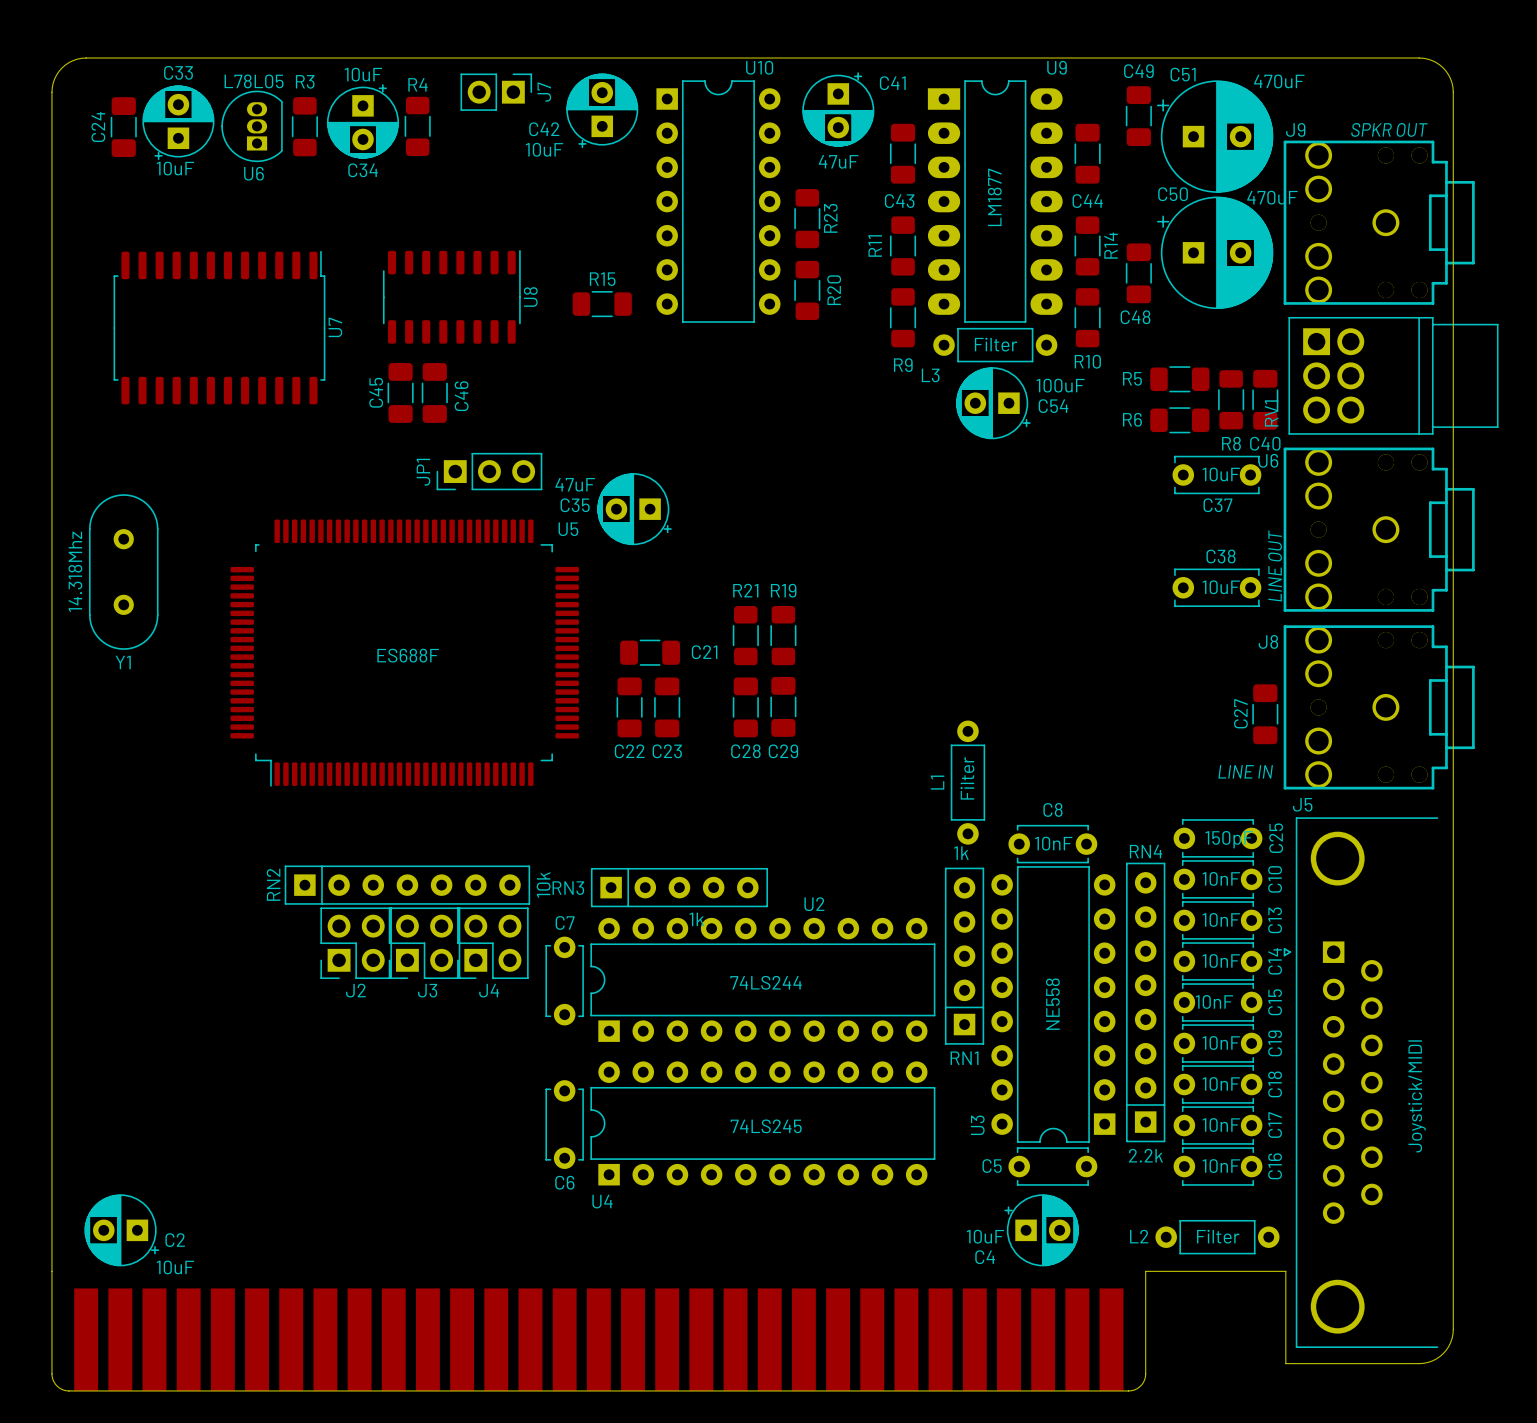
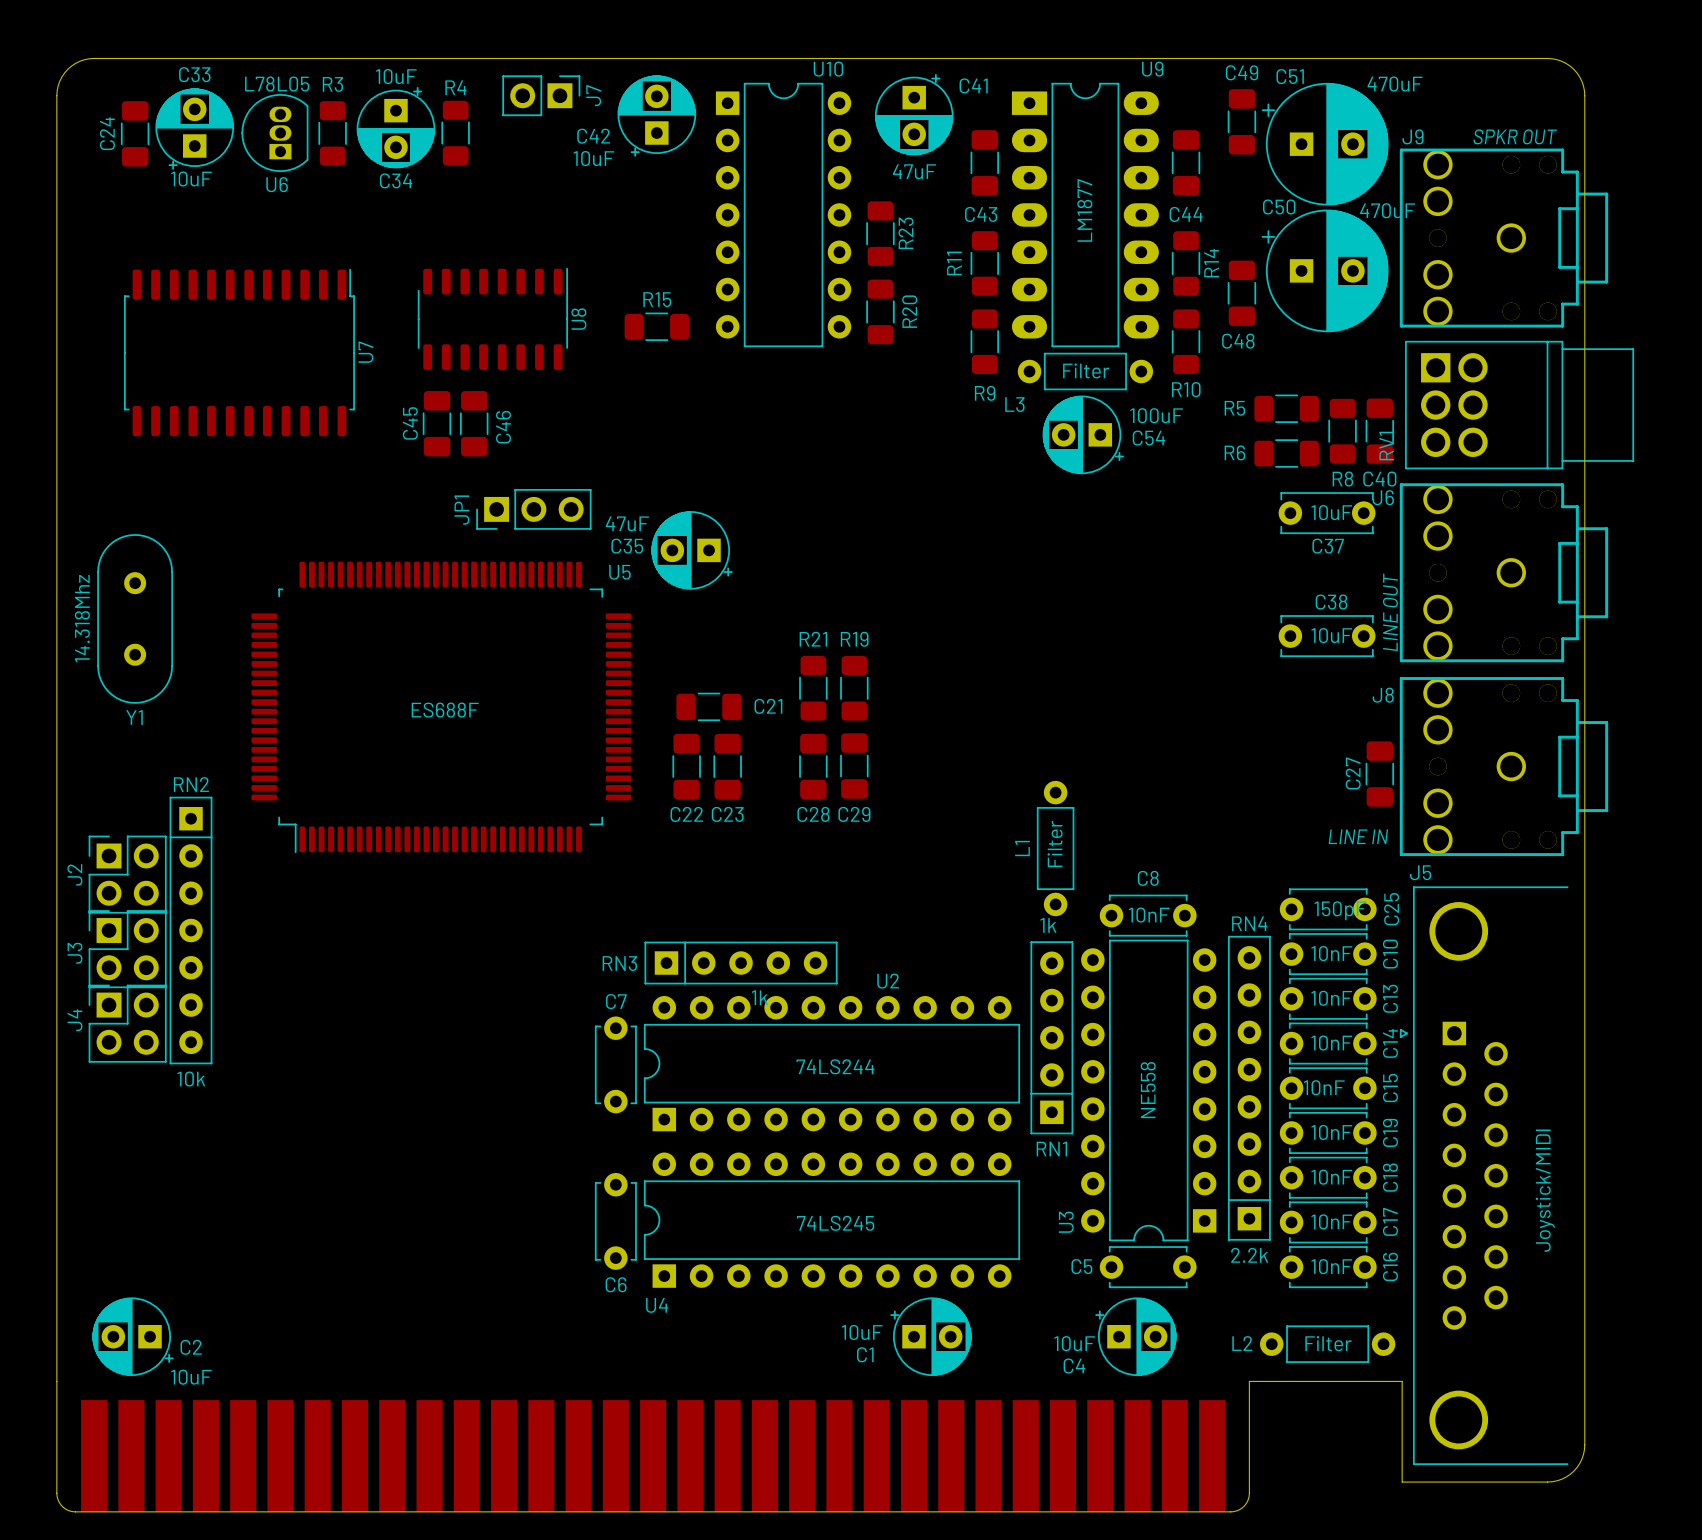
RN2 rotation: 0° (407, 885) -> 90° clockwise (191, 930)
RN2 position: (407, 885) -> (191, 930)
J2 rotation: 0° (356, 943) -> 90° clockwise (127, 874)
J2 position: (356, 943) -> (127, 874)
J3 rotation: 0° (424, 943) -> 90° clockwise (127, 949)
J3 position: (424, 943) -> (127, 949)
J4 rotation: 0° (492, 943) -> 90° clockwise (127, 1023)
J4 position: (492, 943) -> (127, 1023)
C1: none -> 10uF (930, 1336)

